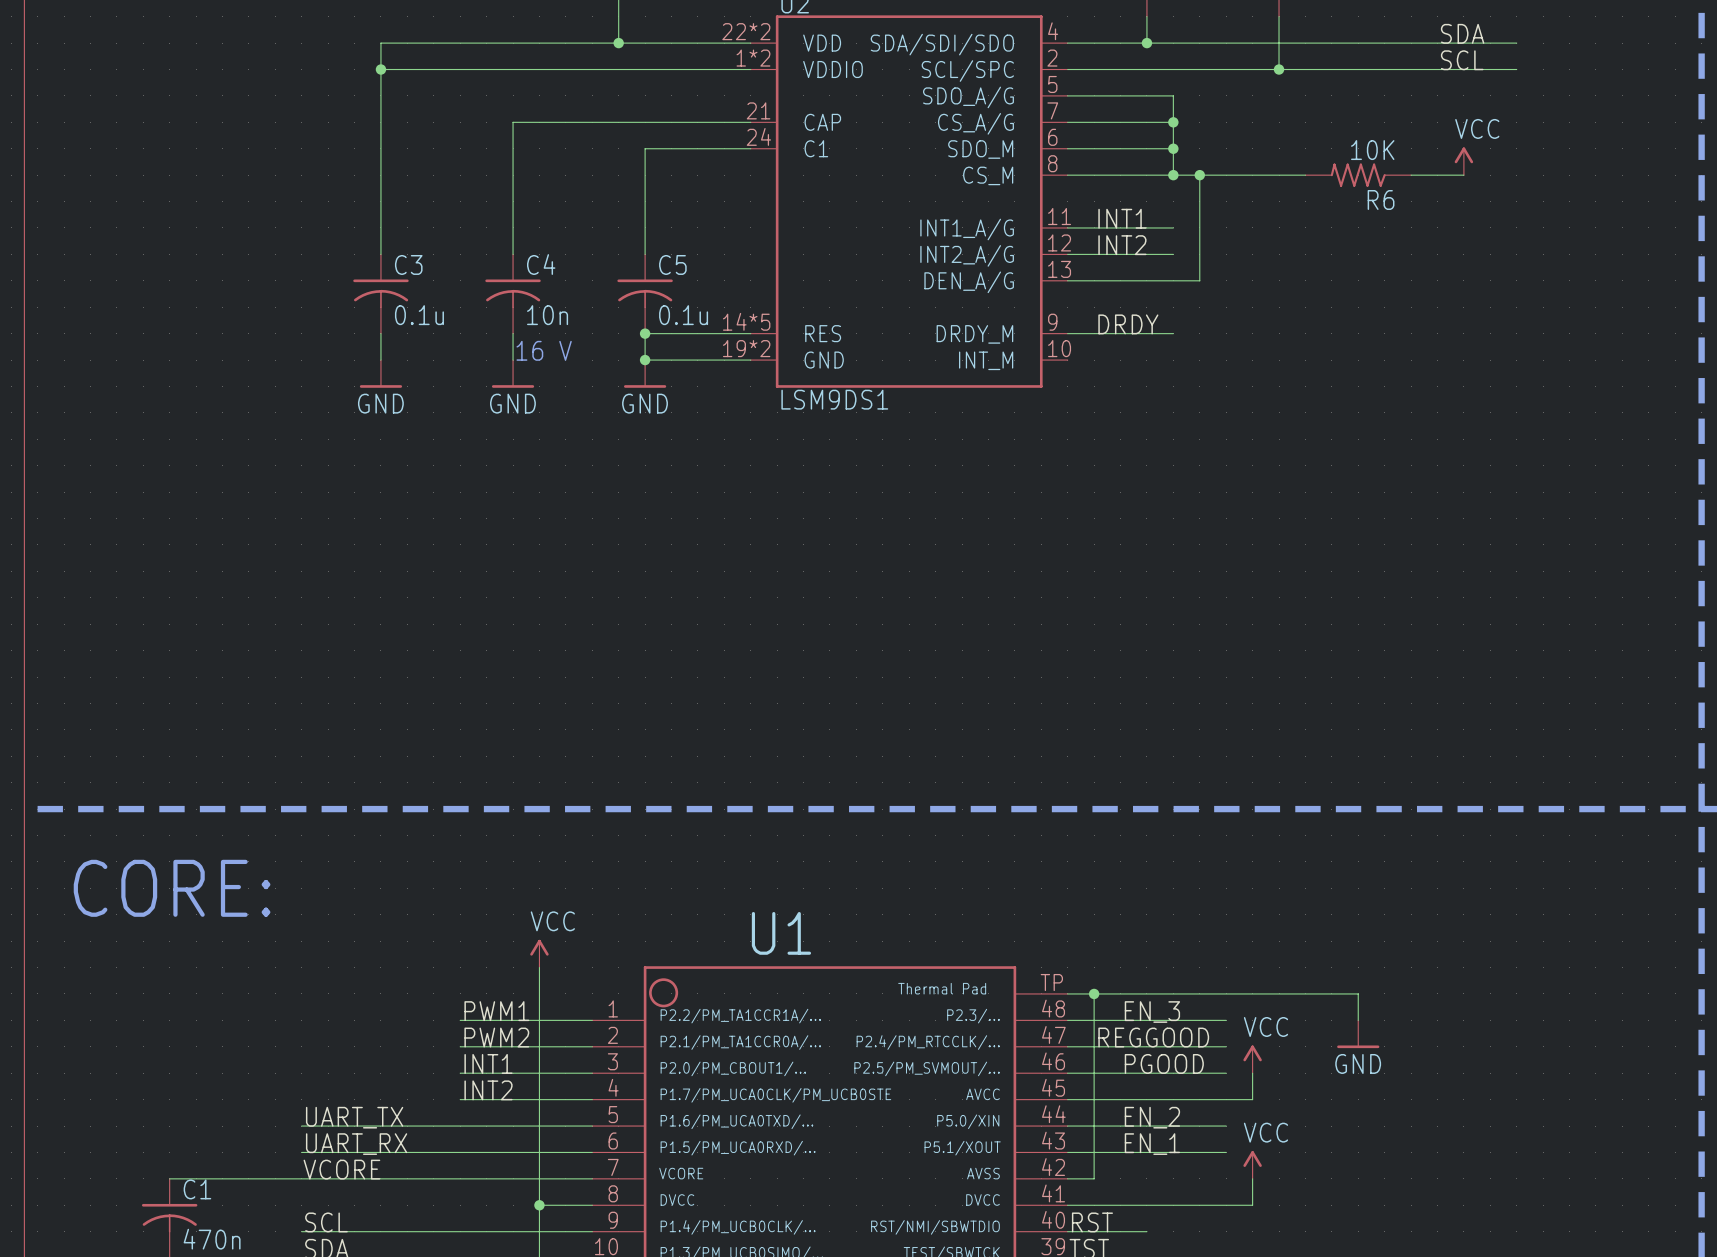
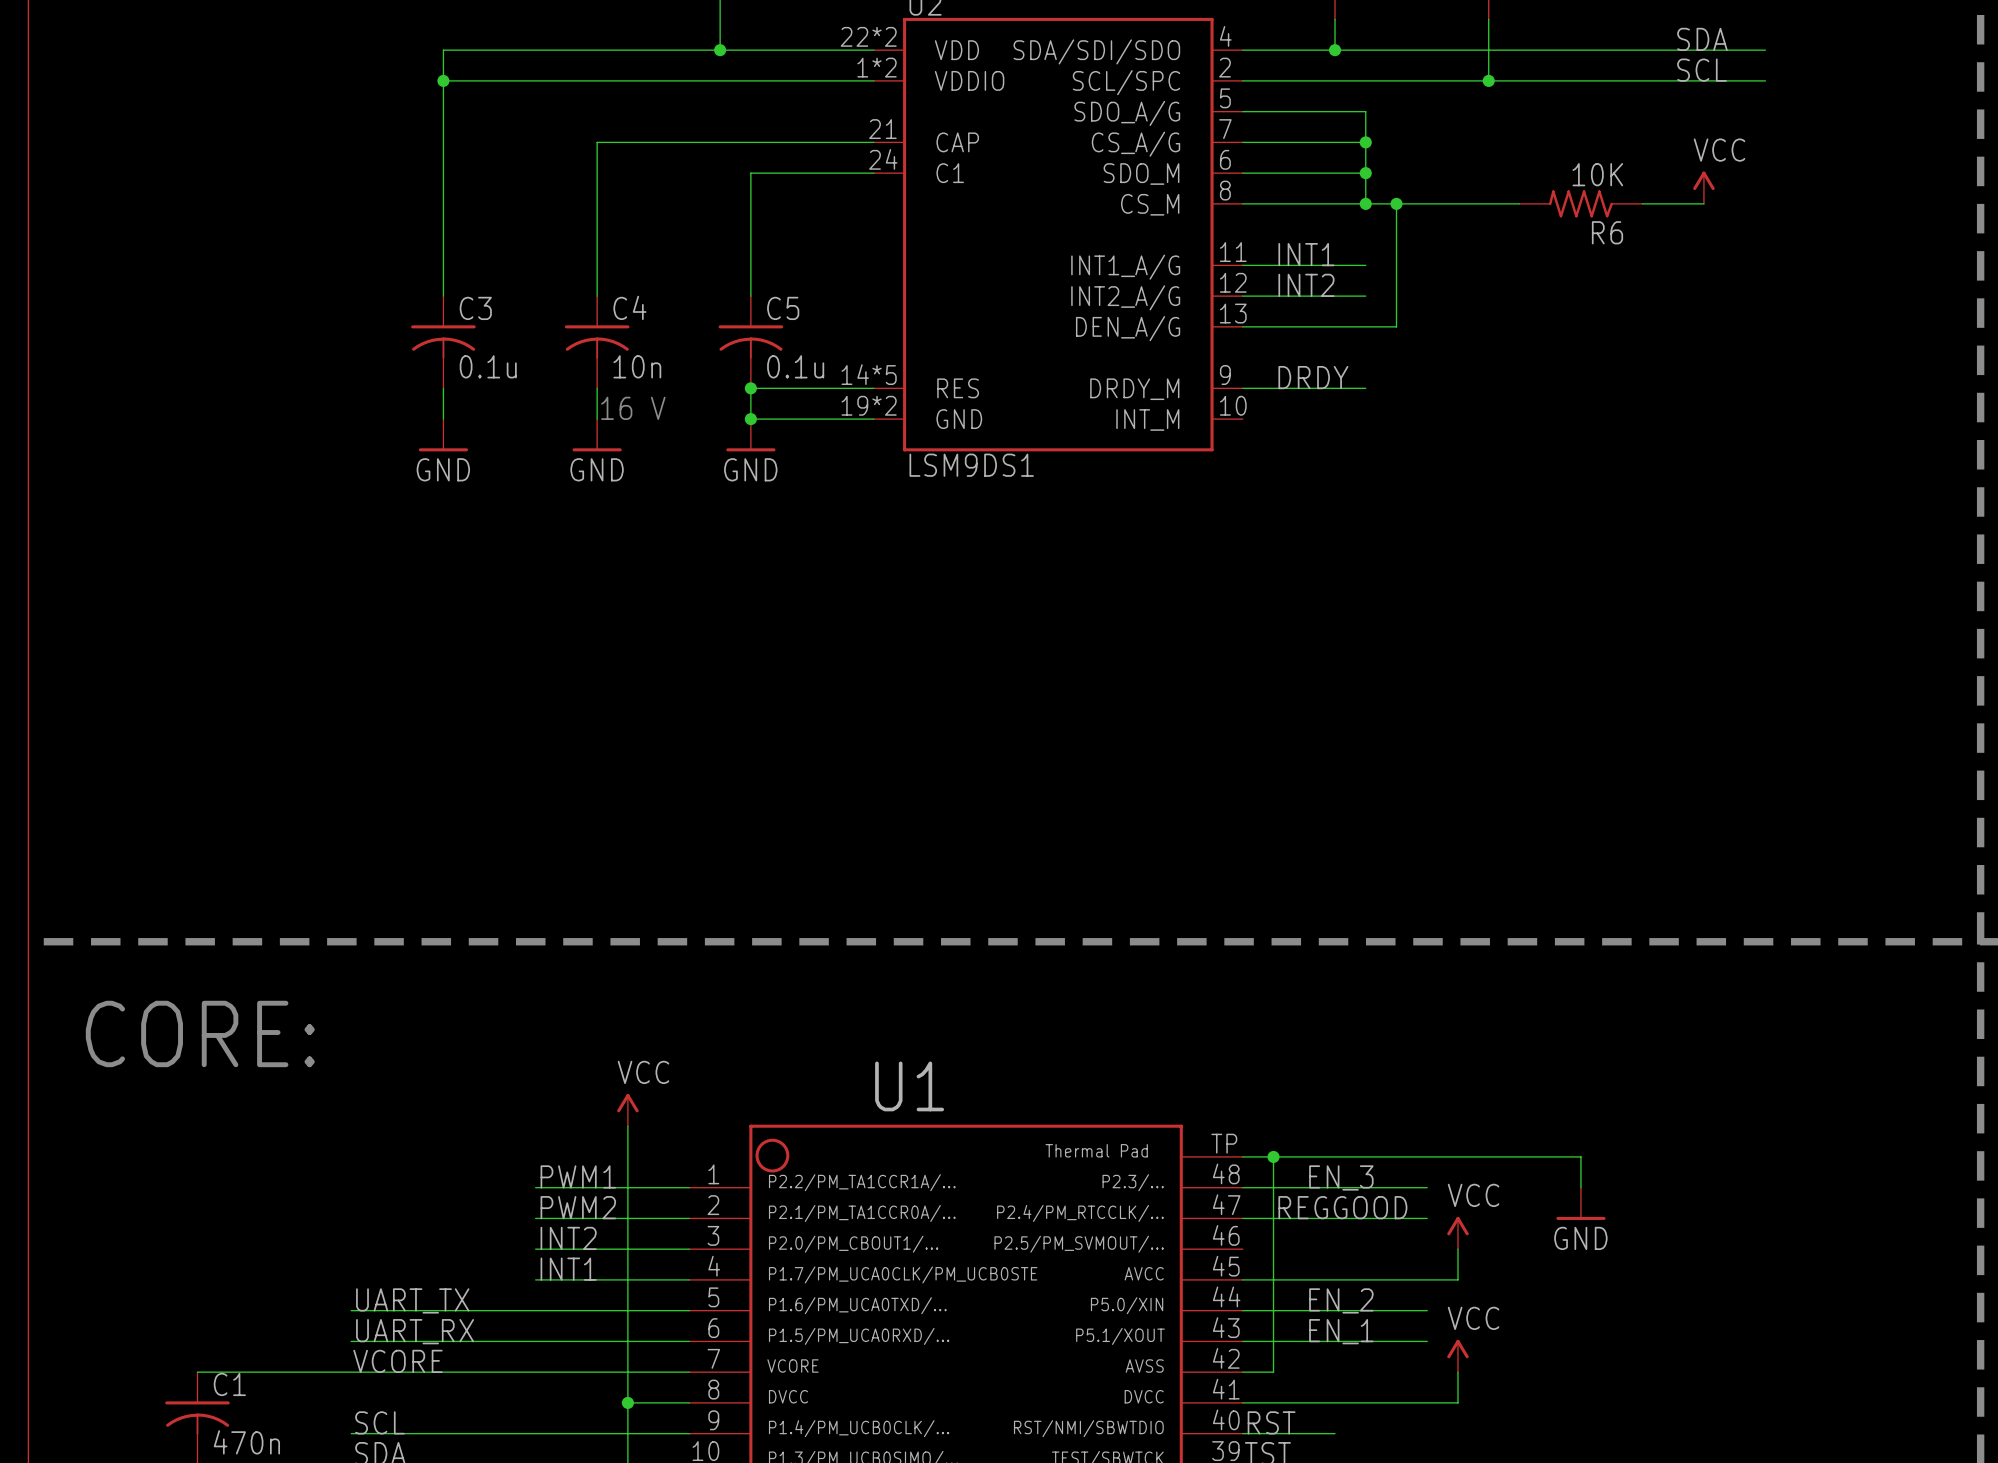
label: INT1 (488, 1063) -> INT2 (568, 1238)
label: PGOOD (1164, 1063) -> none
wire: (1067, 1073) (1226, 1073) -> none
label: INT2 (488, 1090) -> INT1 (568, 1269)

